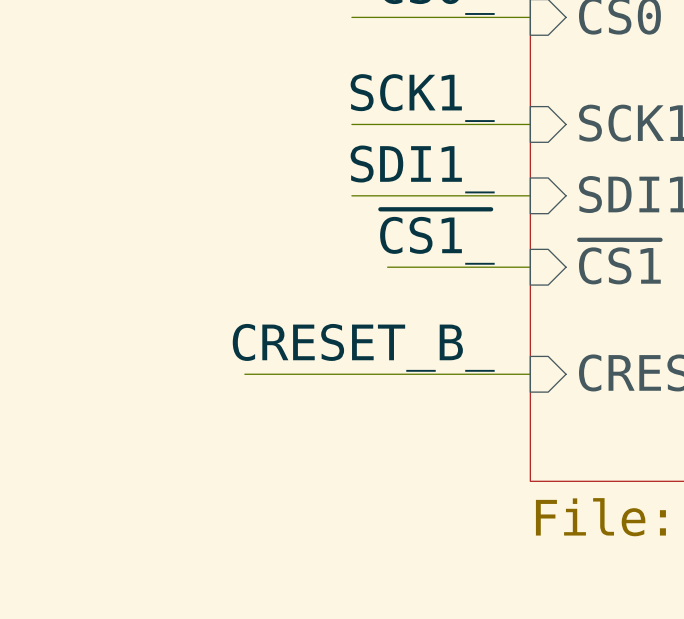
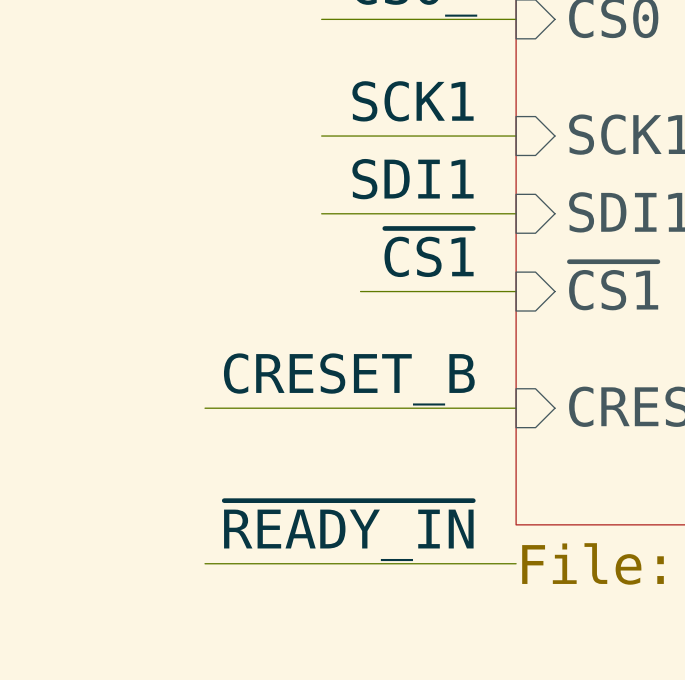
label: SCK1_ (422, 98) -> SCK1 (412, 101)
label: SDI1_ (422, 169) -> SDI1 (412, 179)
label: ~{CS1_} (437, 237) -> ~{CS1} (429, 252)
label: CRESET_B_ (363, 347) -> CRESET_B (349, 379)
label: none -> ~{READY_IN} (348, 530)
wire: none -> (205, 563) (516, 563)

